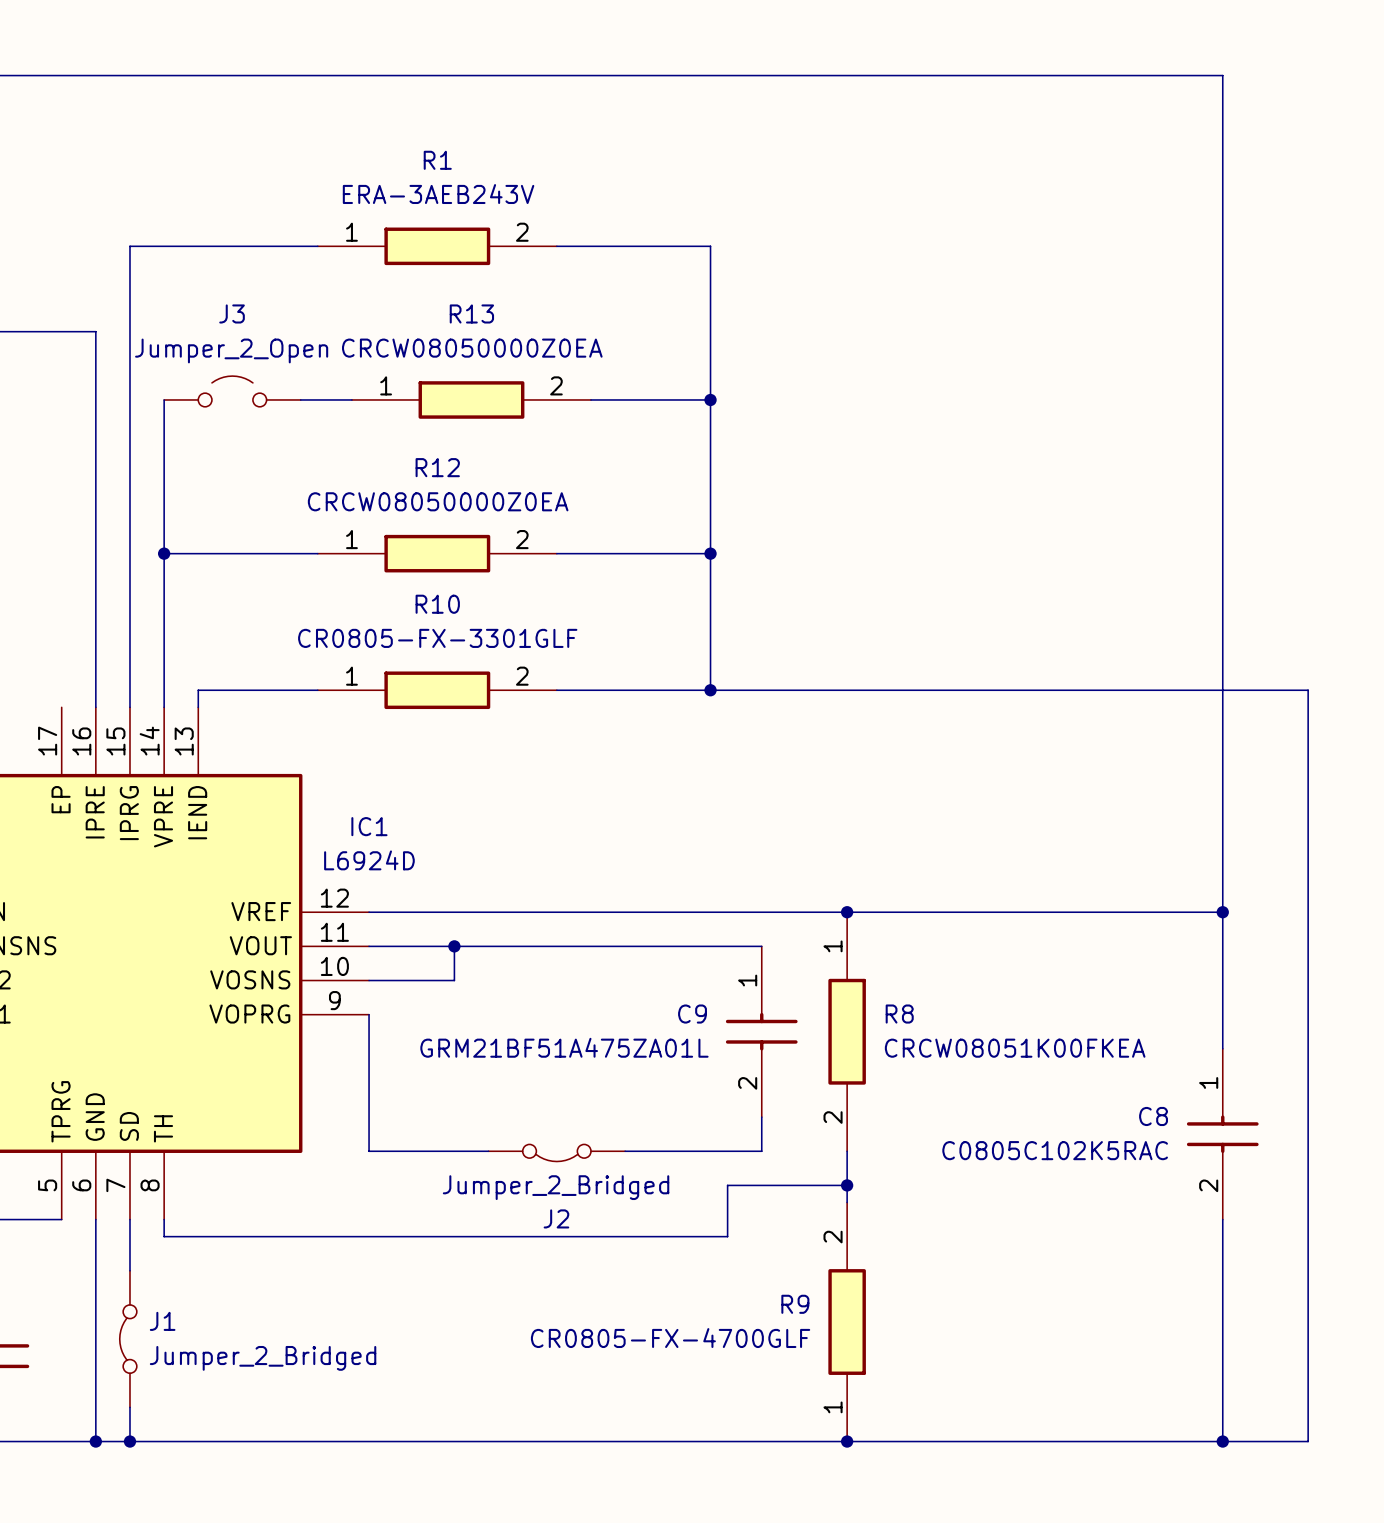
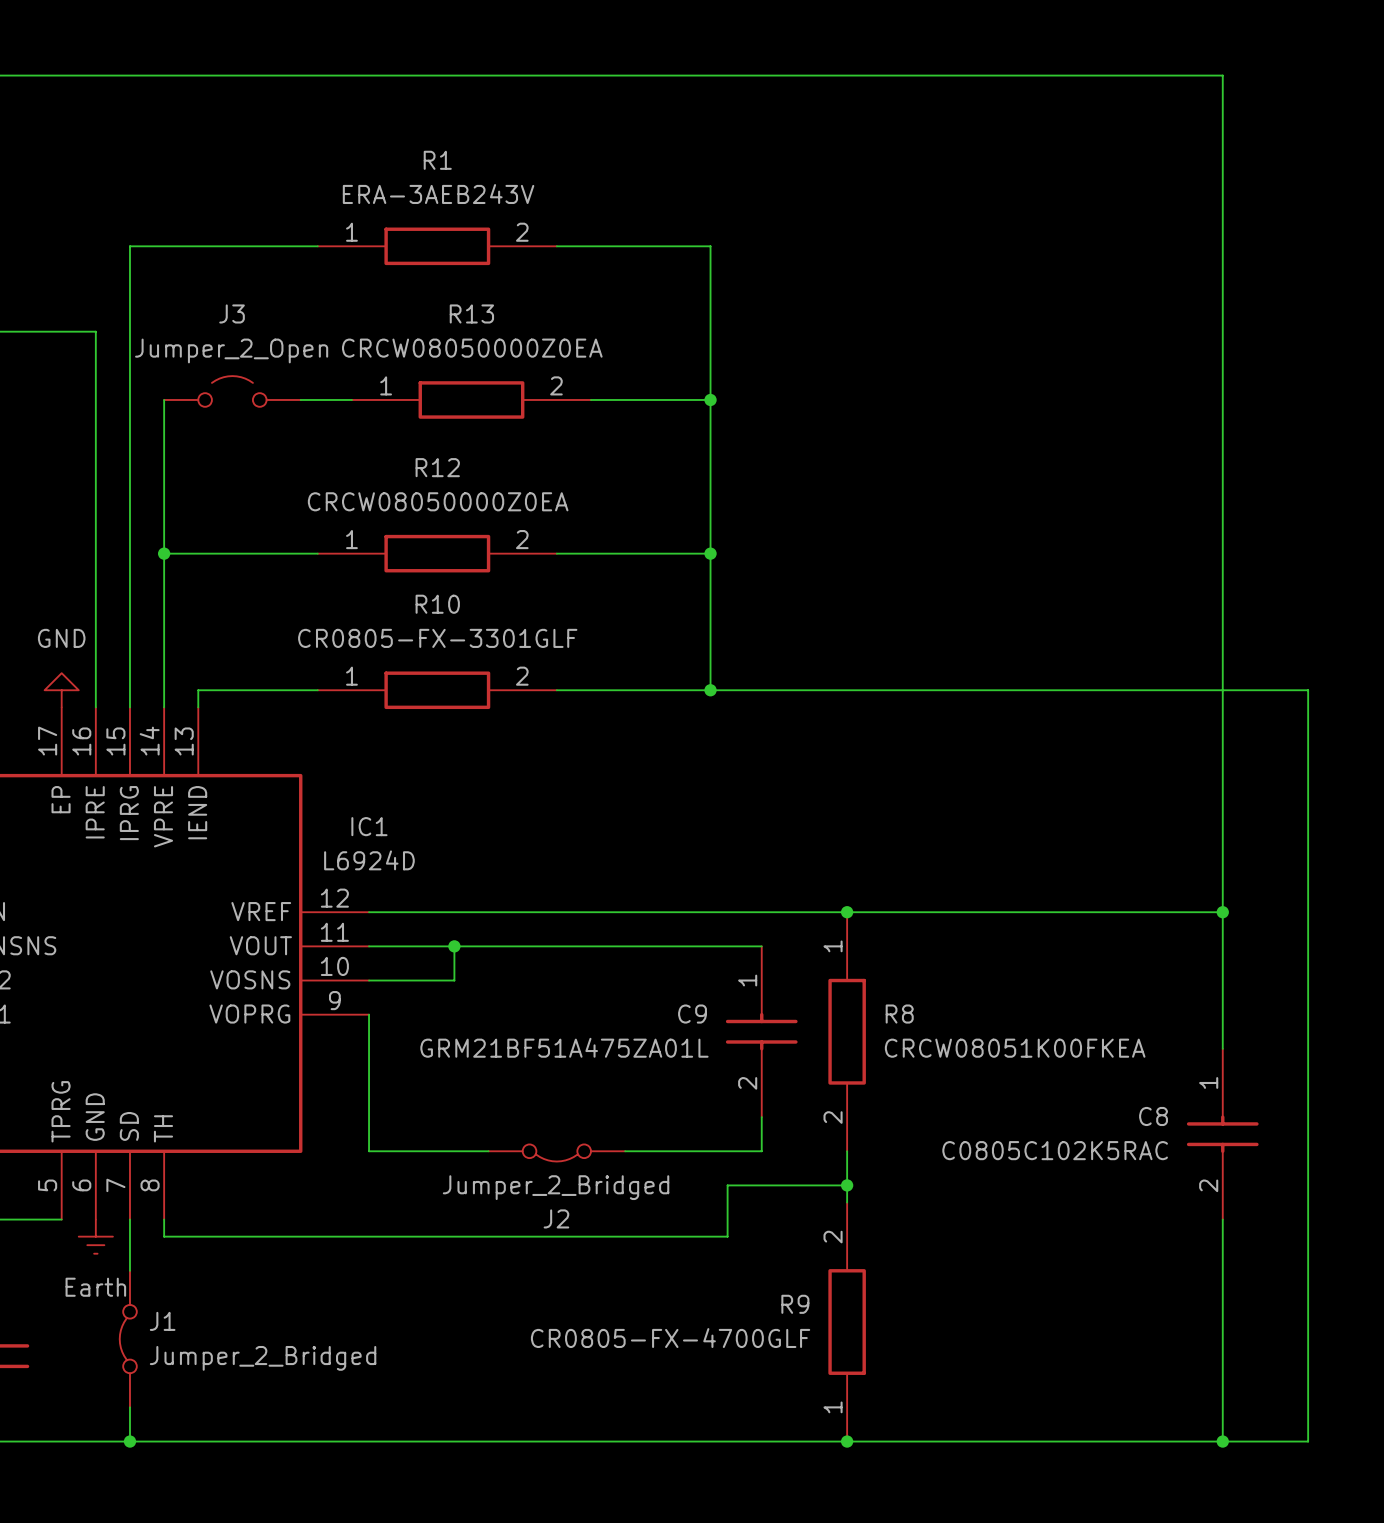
power symbol: none -> GND (61, 690)
wire: (95, 1219) (95, 1441) -> none
power symbol: none -> Earth (95, 1236)
junction: (95, 1441) -> none

